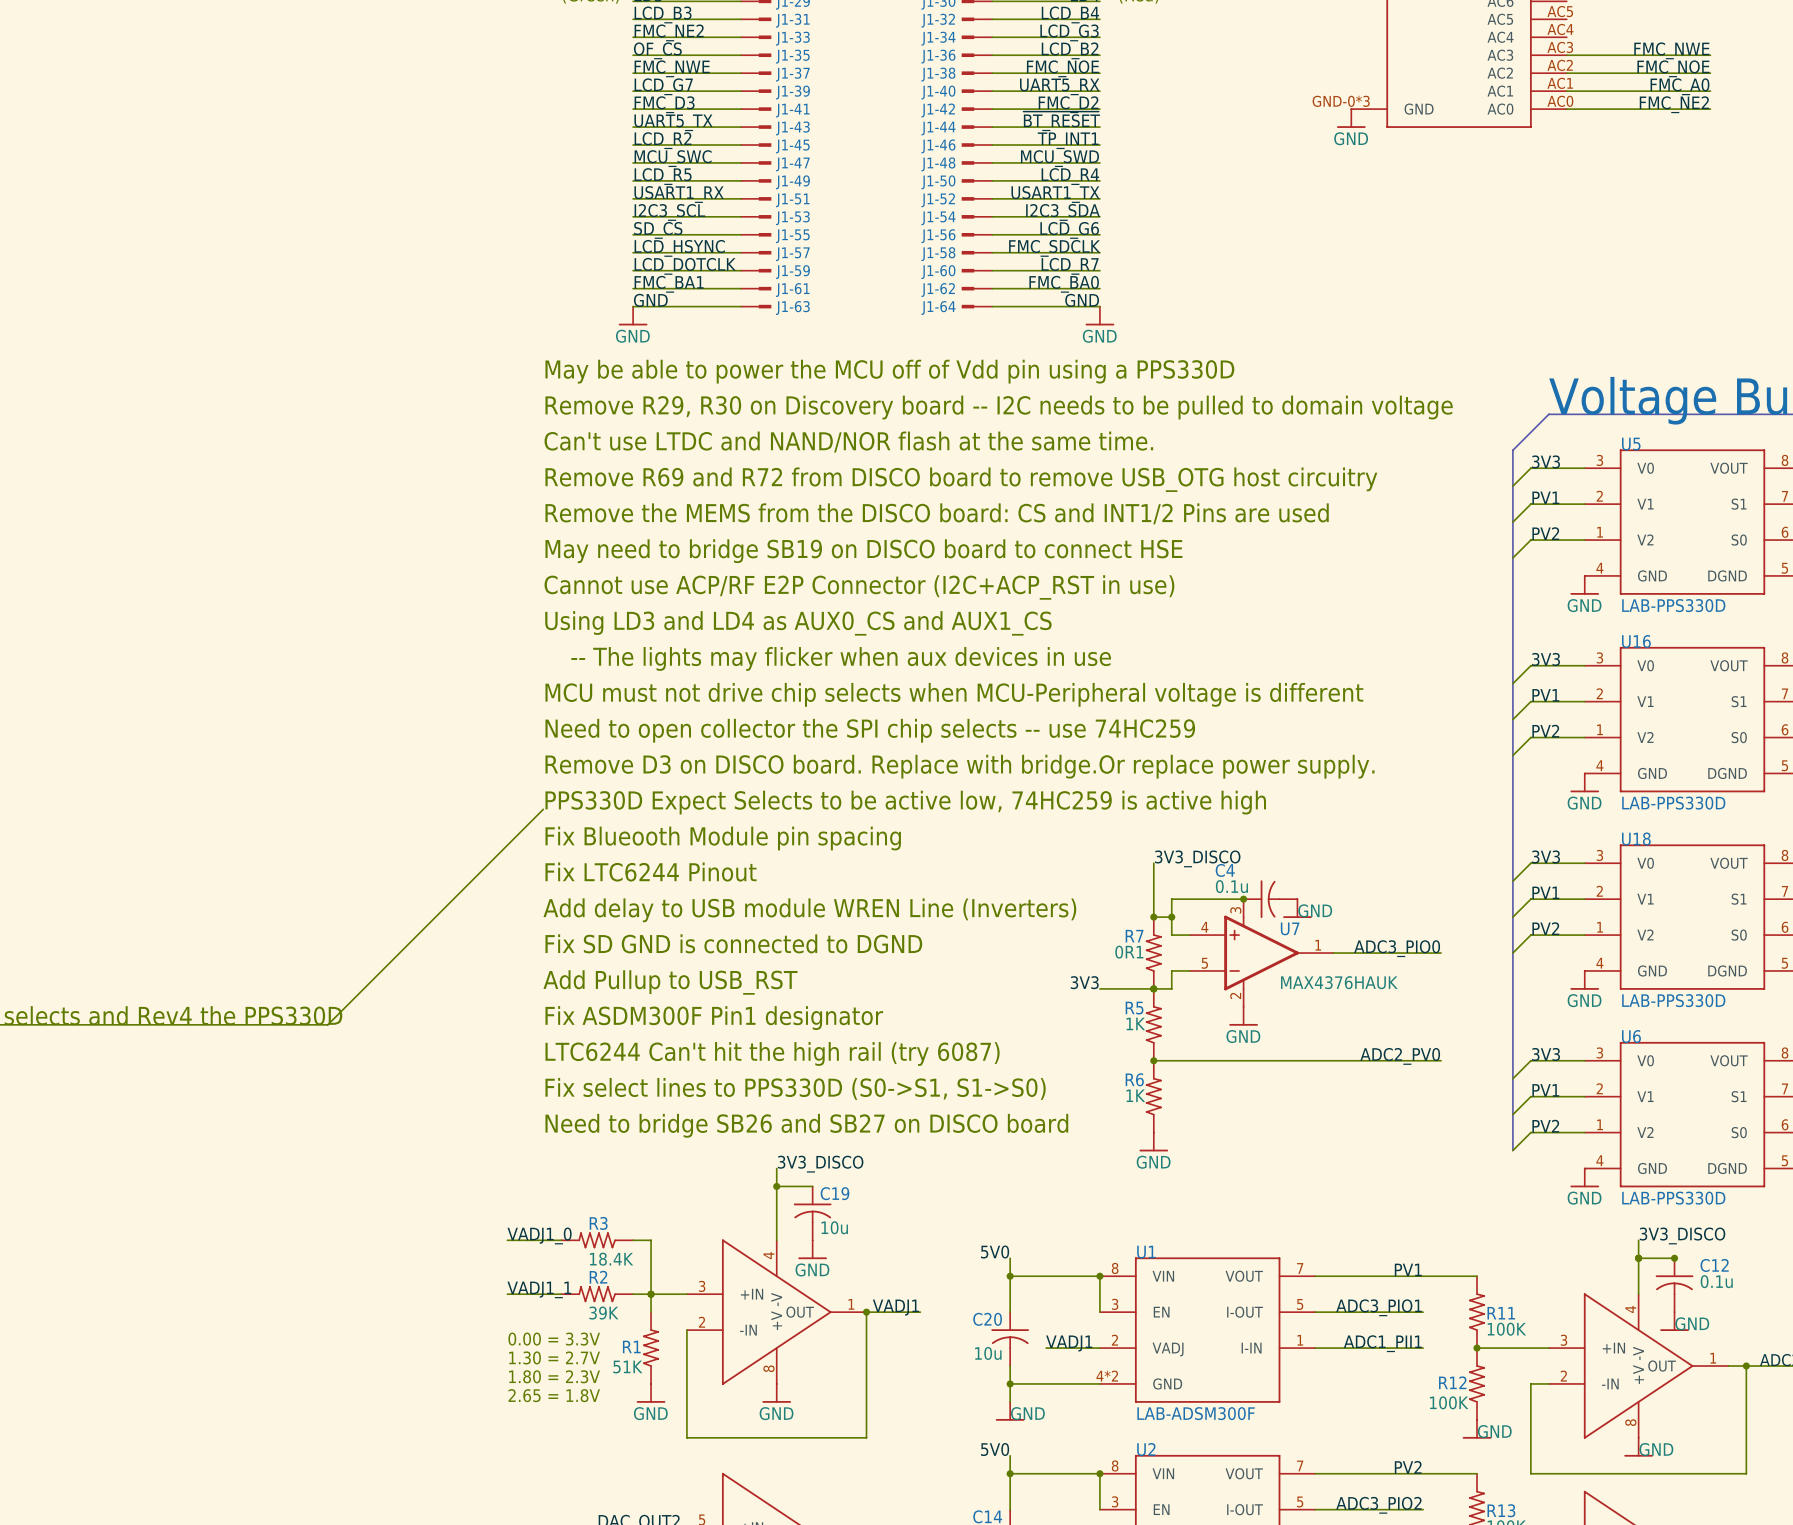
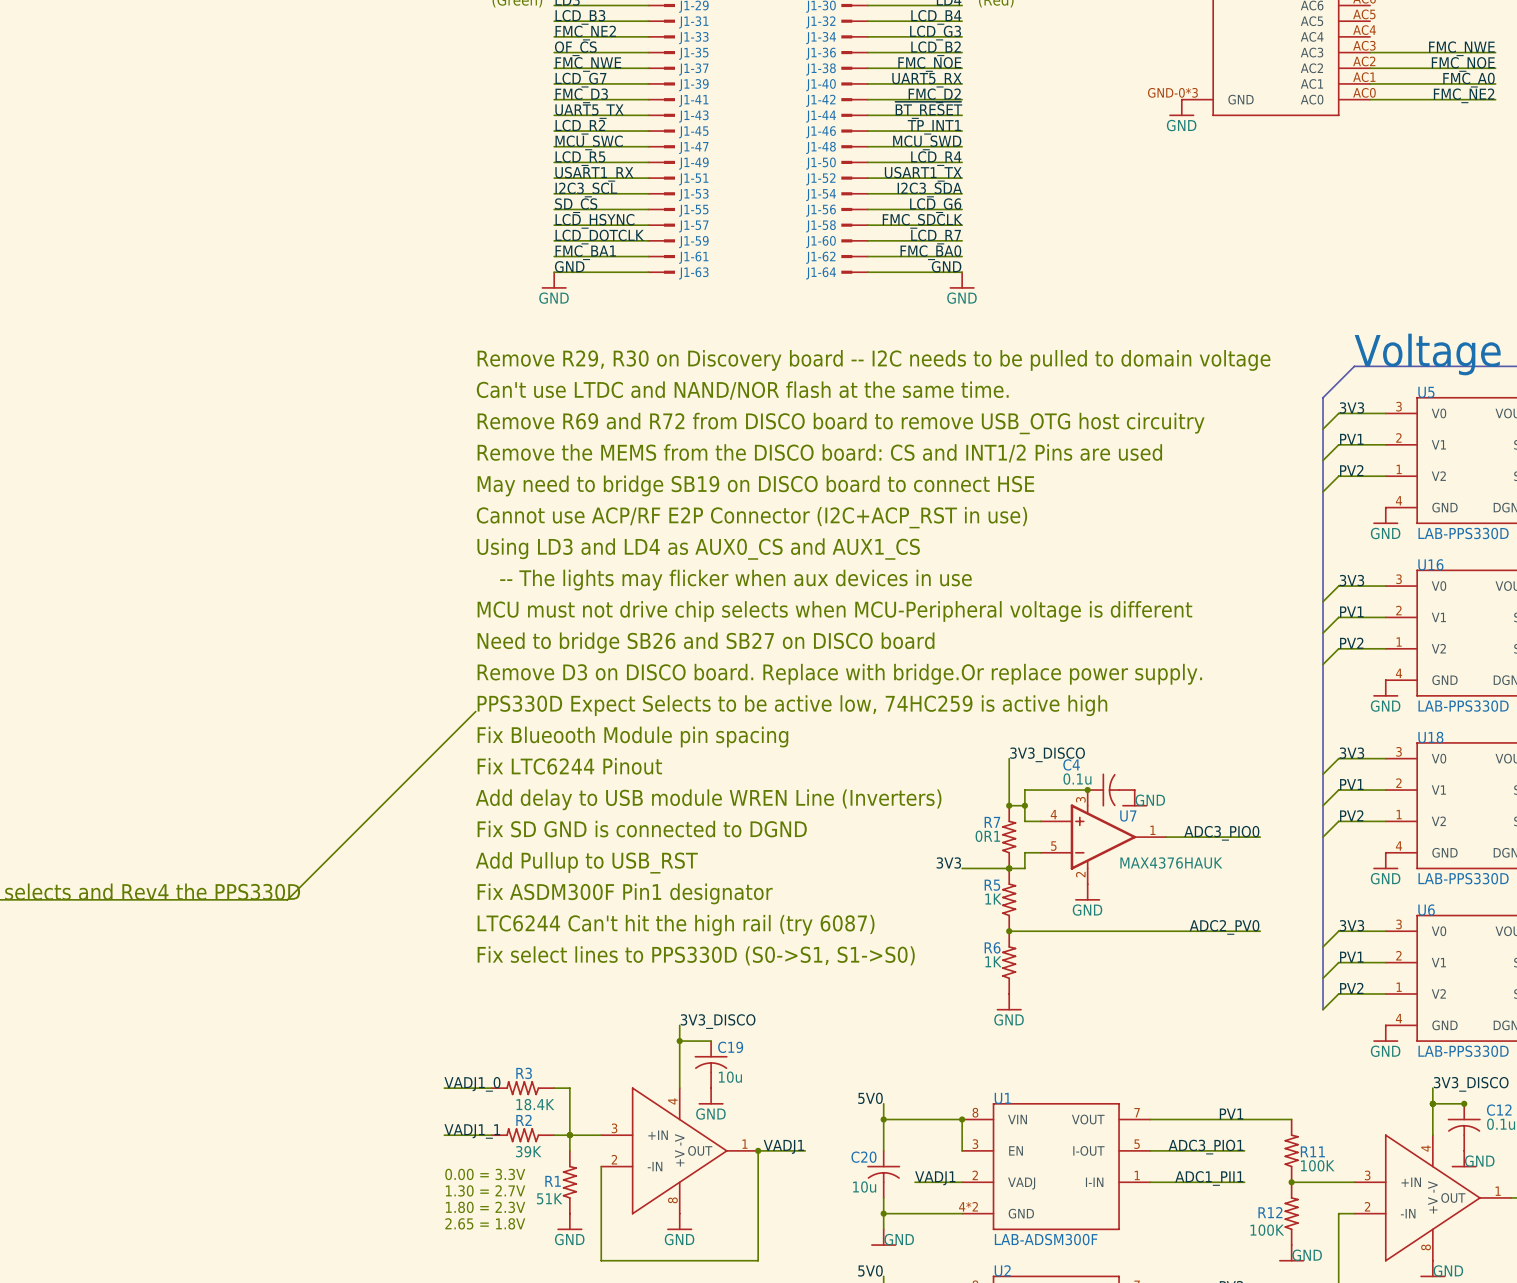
text: May be able to power the MCU off of Vdd pin using a PPS330D (889, 371) -> none
text: Need to open collector the SPI chip selects -- use 74HC259 (870, 730) -> Need to bridge SB26 and SB27 on DISCO board (706, 642)
text: Need to bridge SB26 and SB27 on DISCO board (806, 1125) -> none

